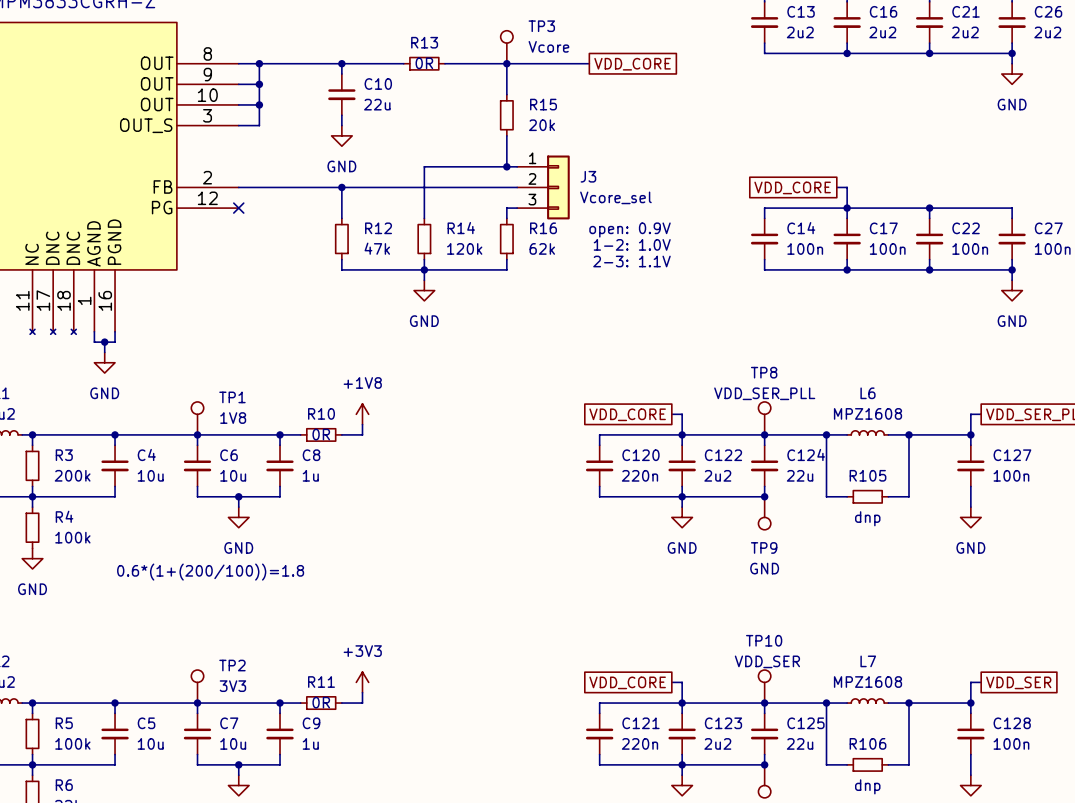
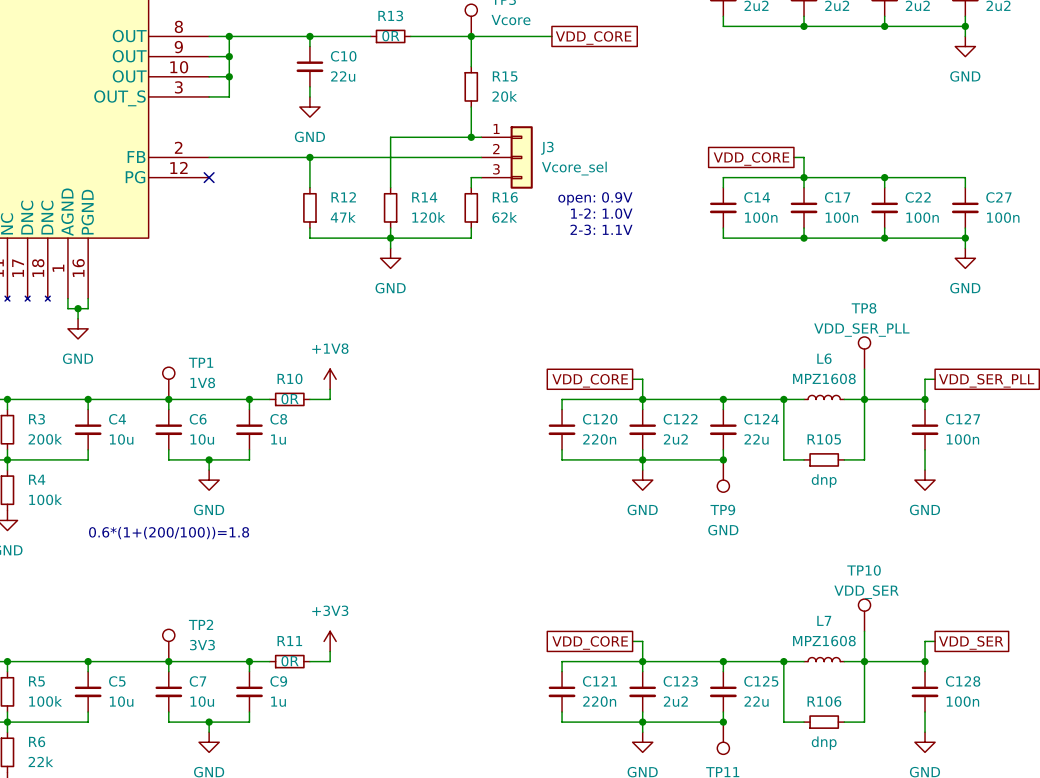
wire: none -> (864, 369) (864, 399)
TP8 position: (764, 418) -> (864, 353)
wire: none -> (864, 631) (864, 661)
TP10 position: (764, 686) -> (864, 615)

